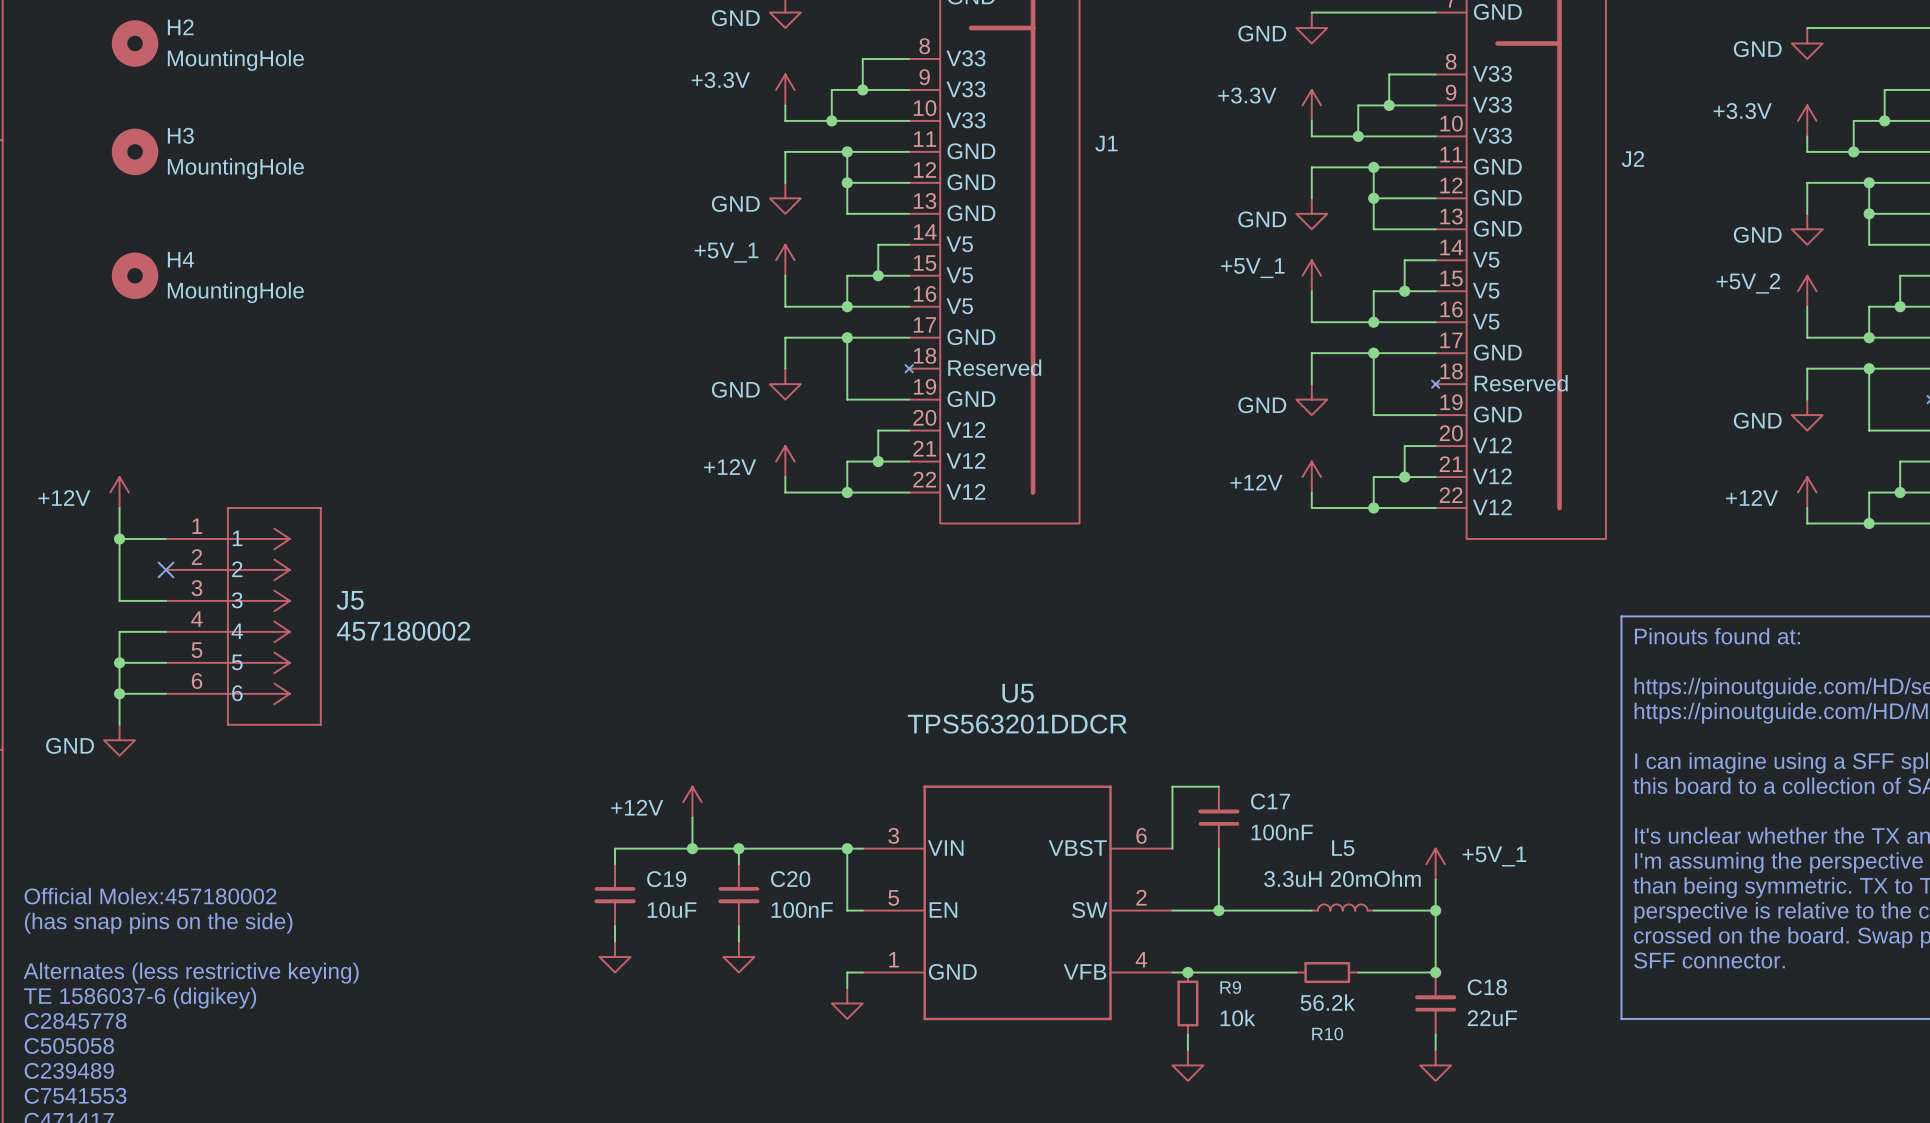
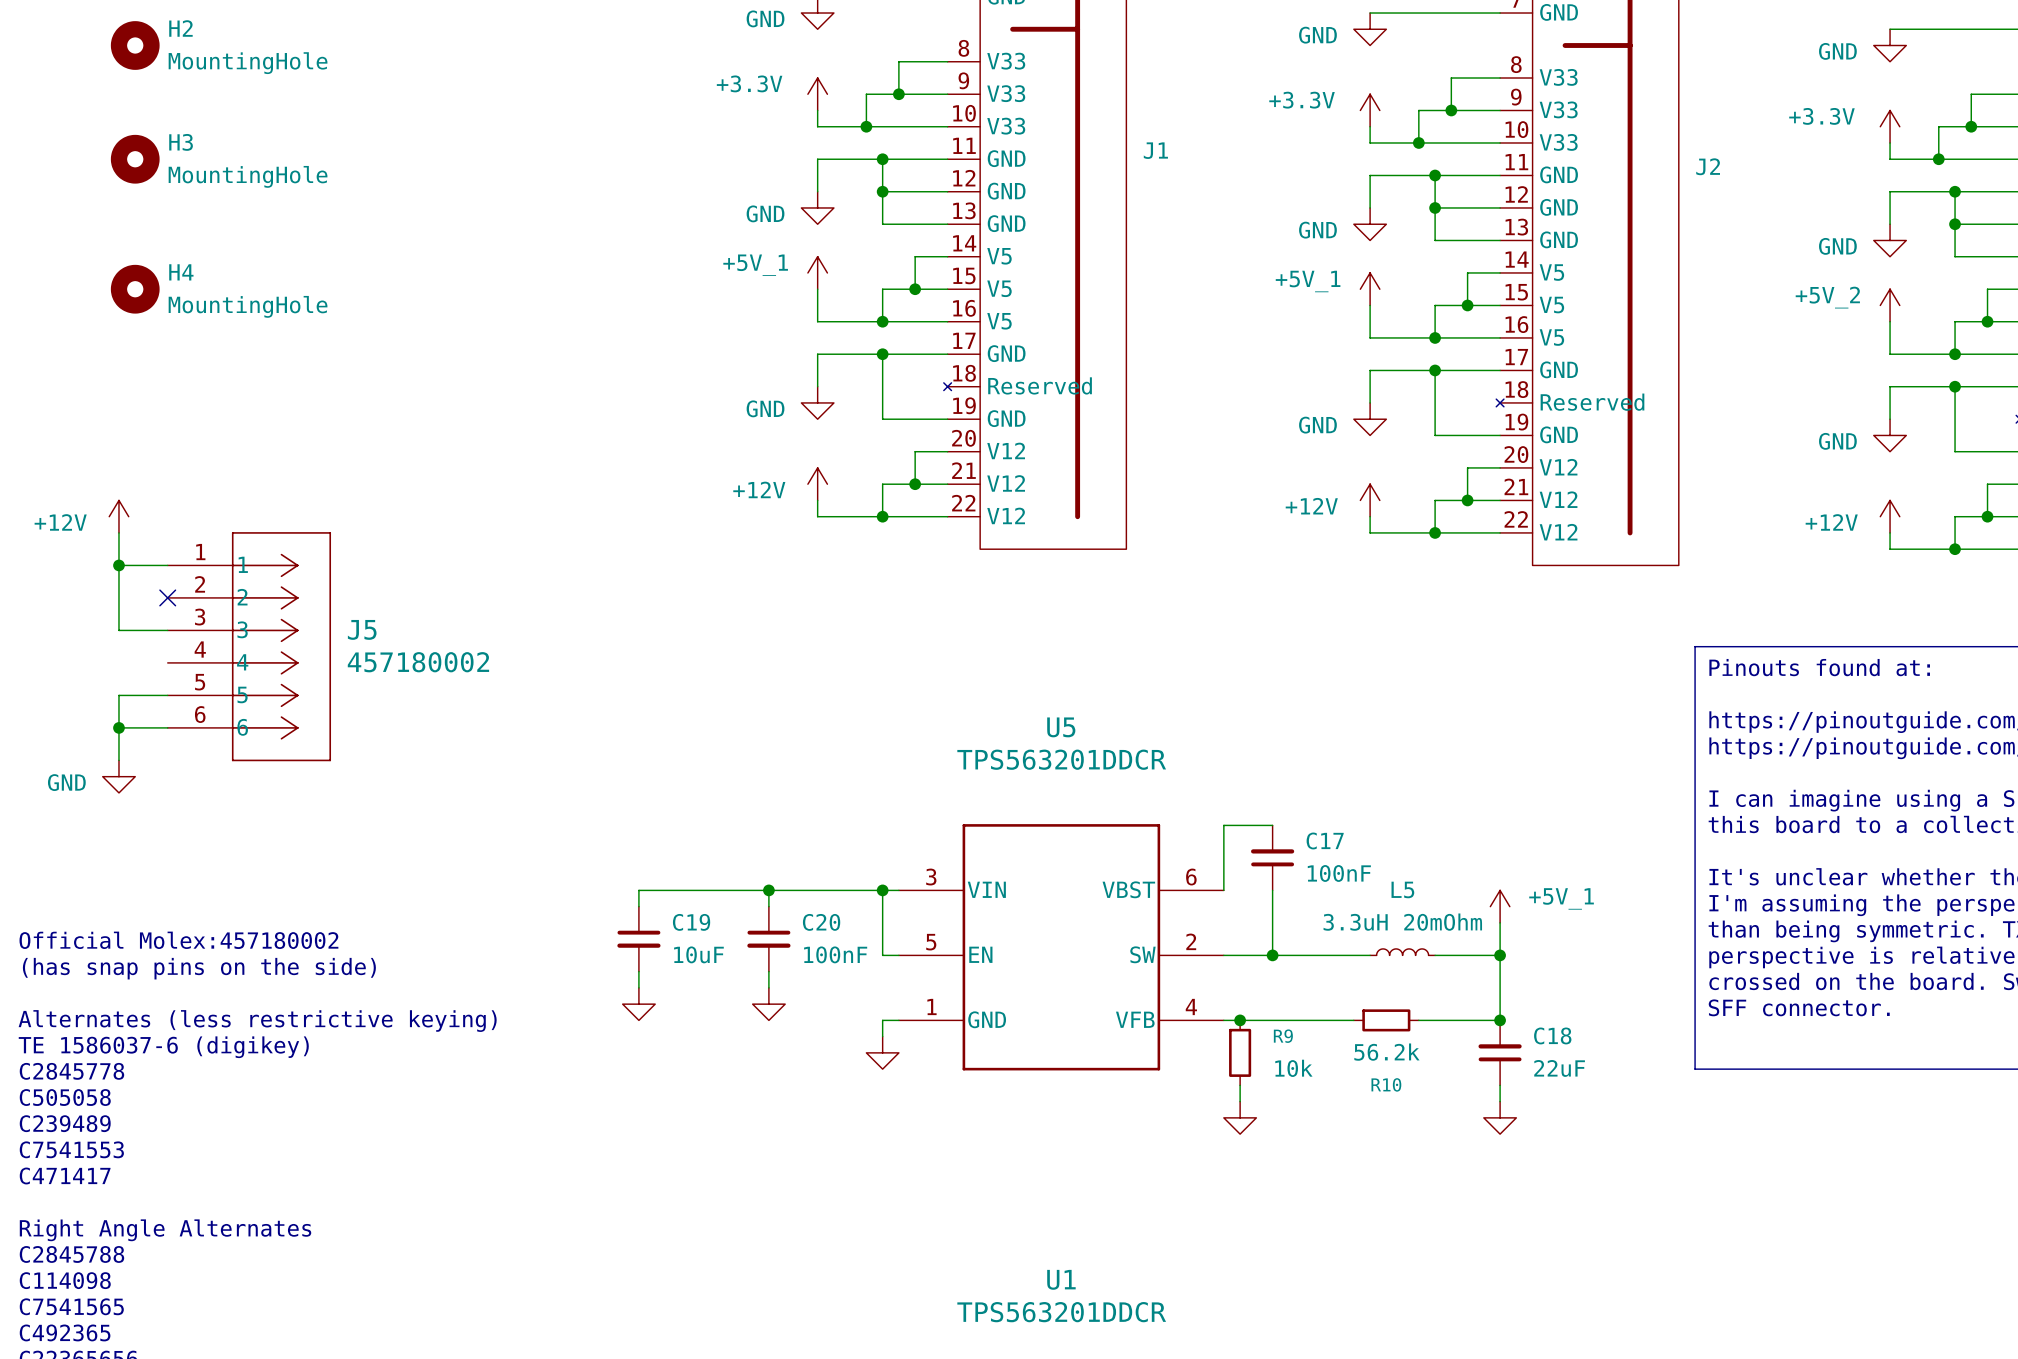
wire: (166, 631) (119, 631) (119, 662) -> none
junction: (119, 662) -> none
power symbol: +12V (692, 802) -> none
wire: (692, 817) (692, 848) -> none
junction: (692, 848) -> none

